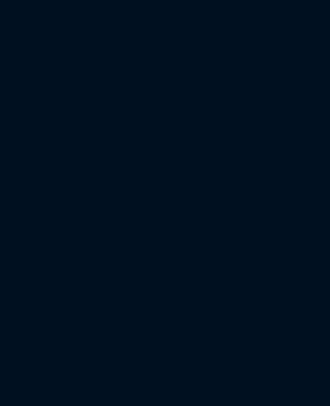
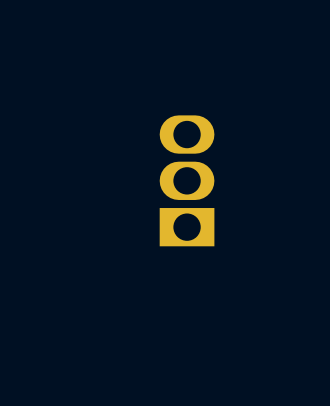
part: none -> (187, 180)

